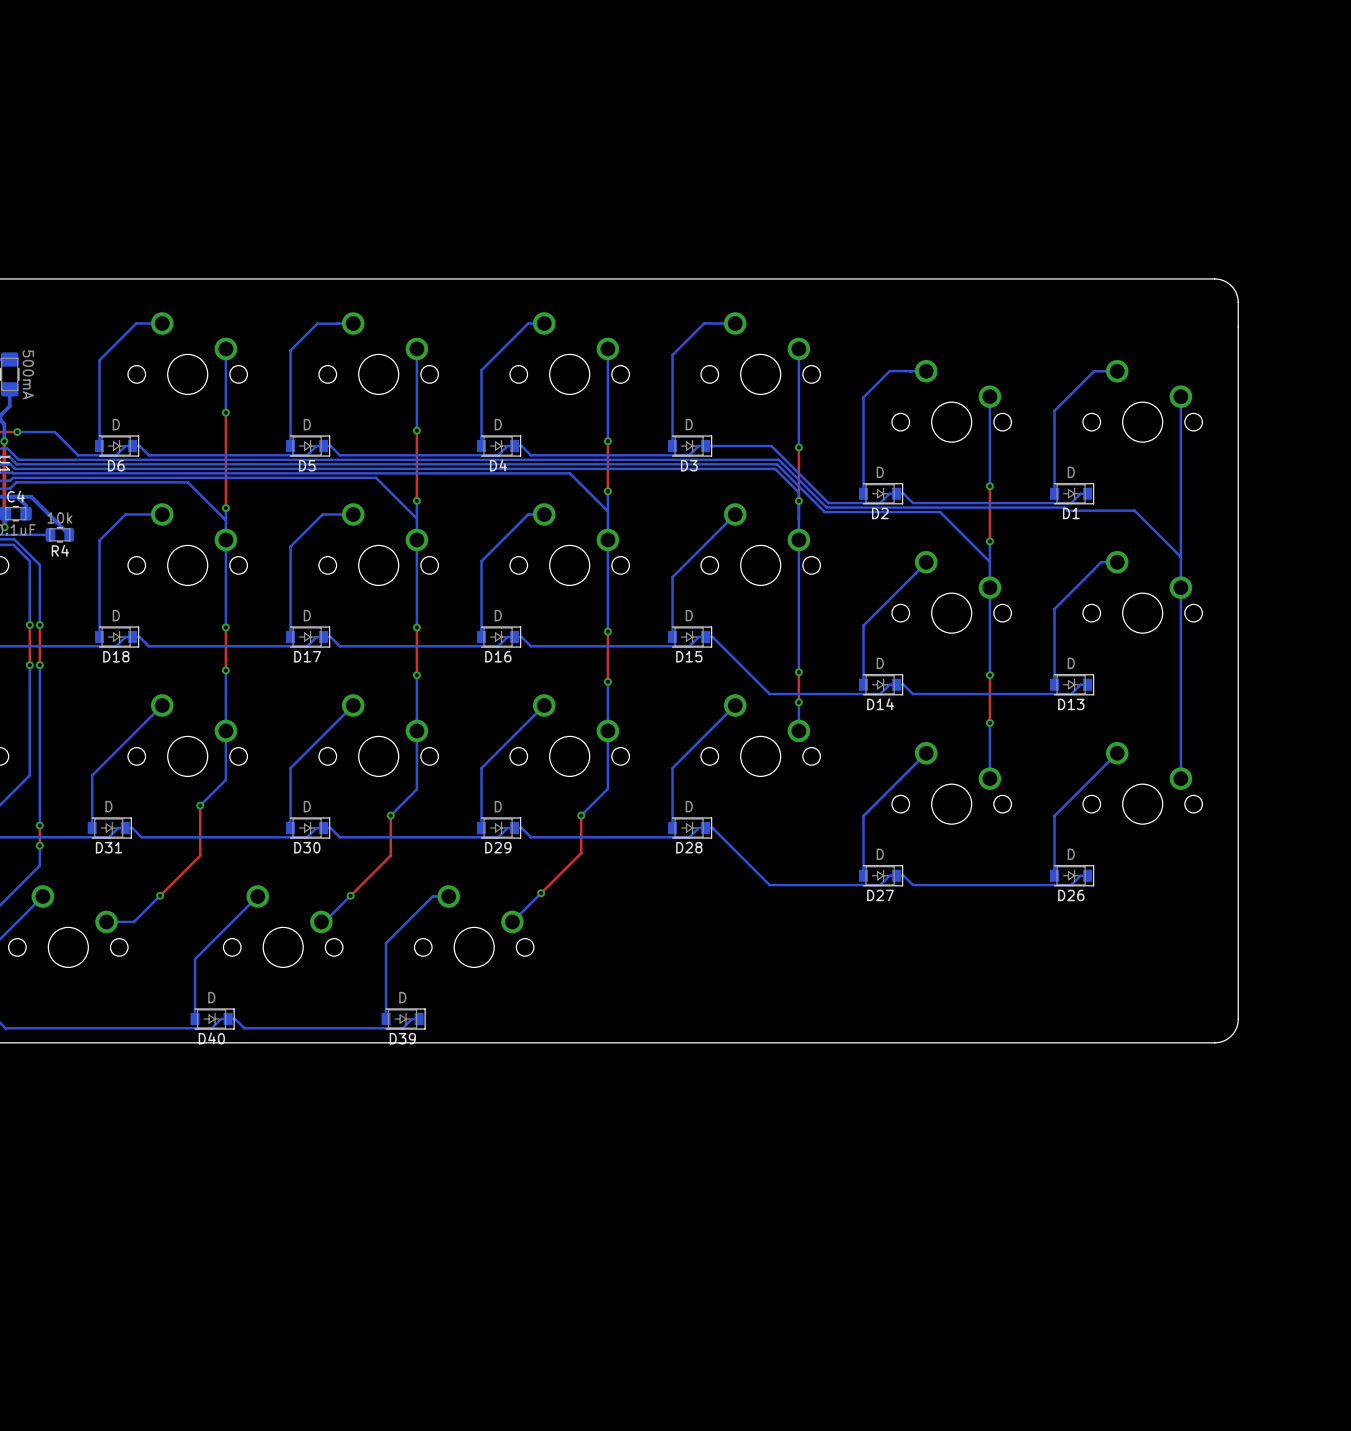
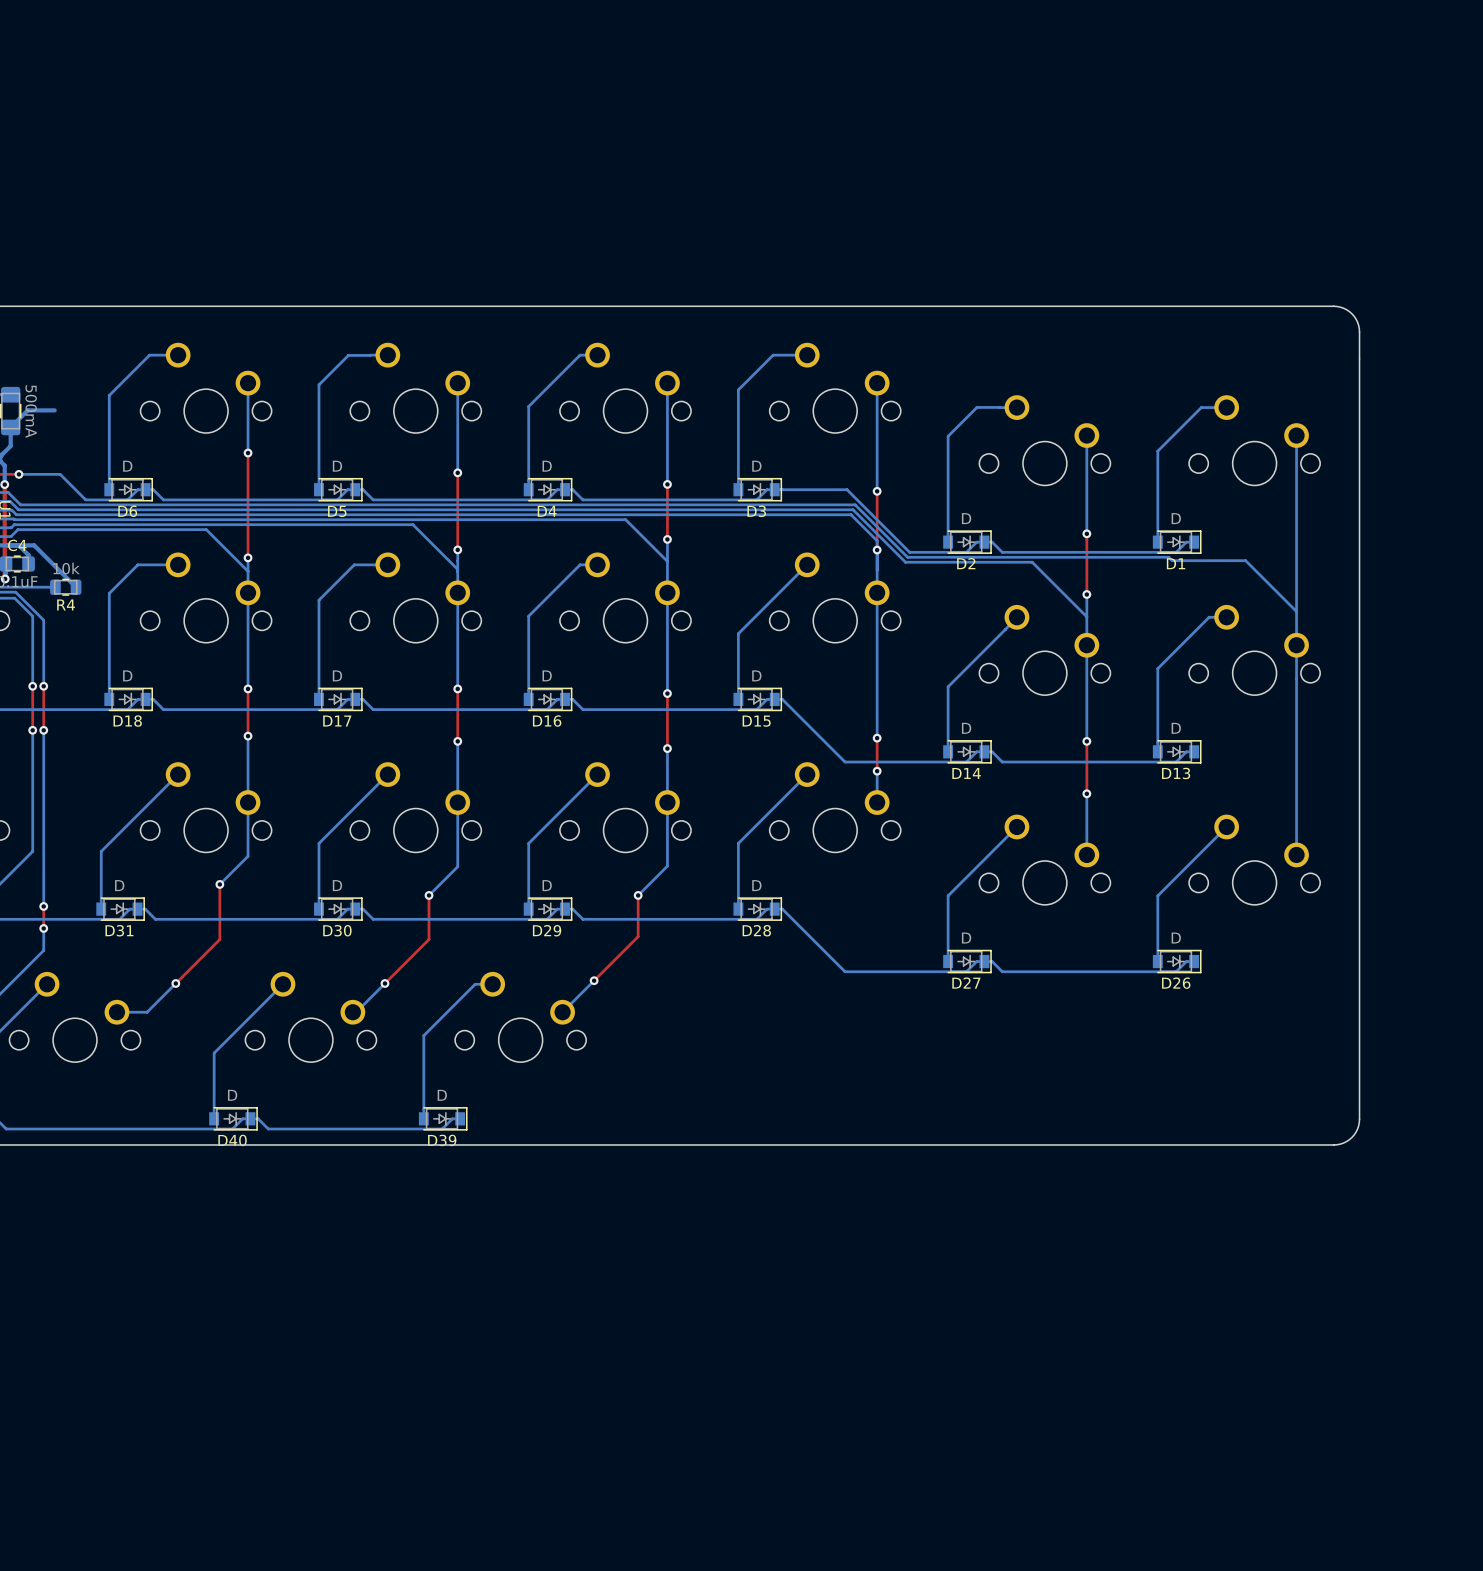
bottom track: none -> (54, 410) (27, 410) (10, 427)

